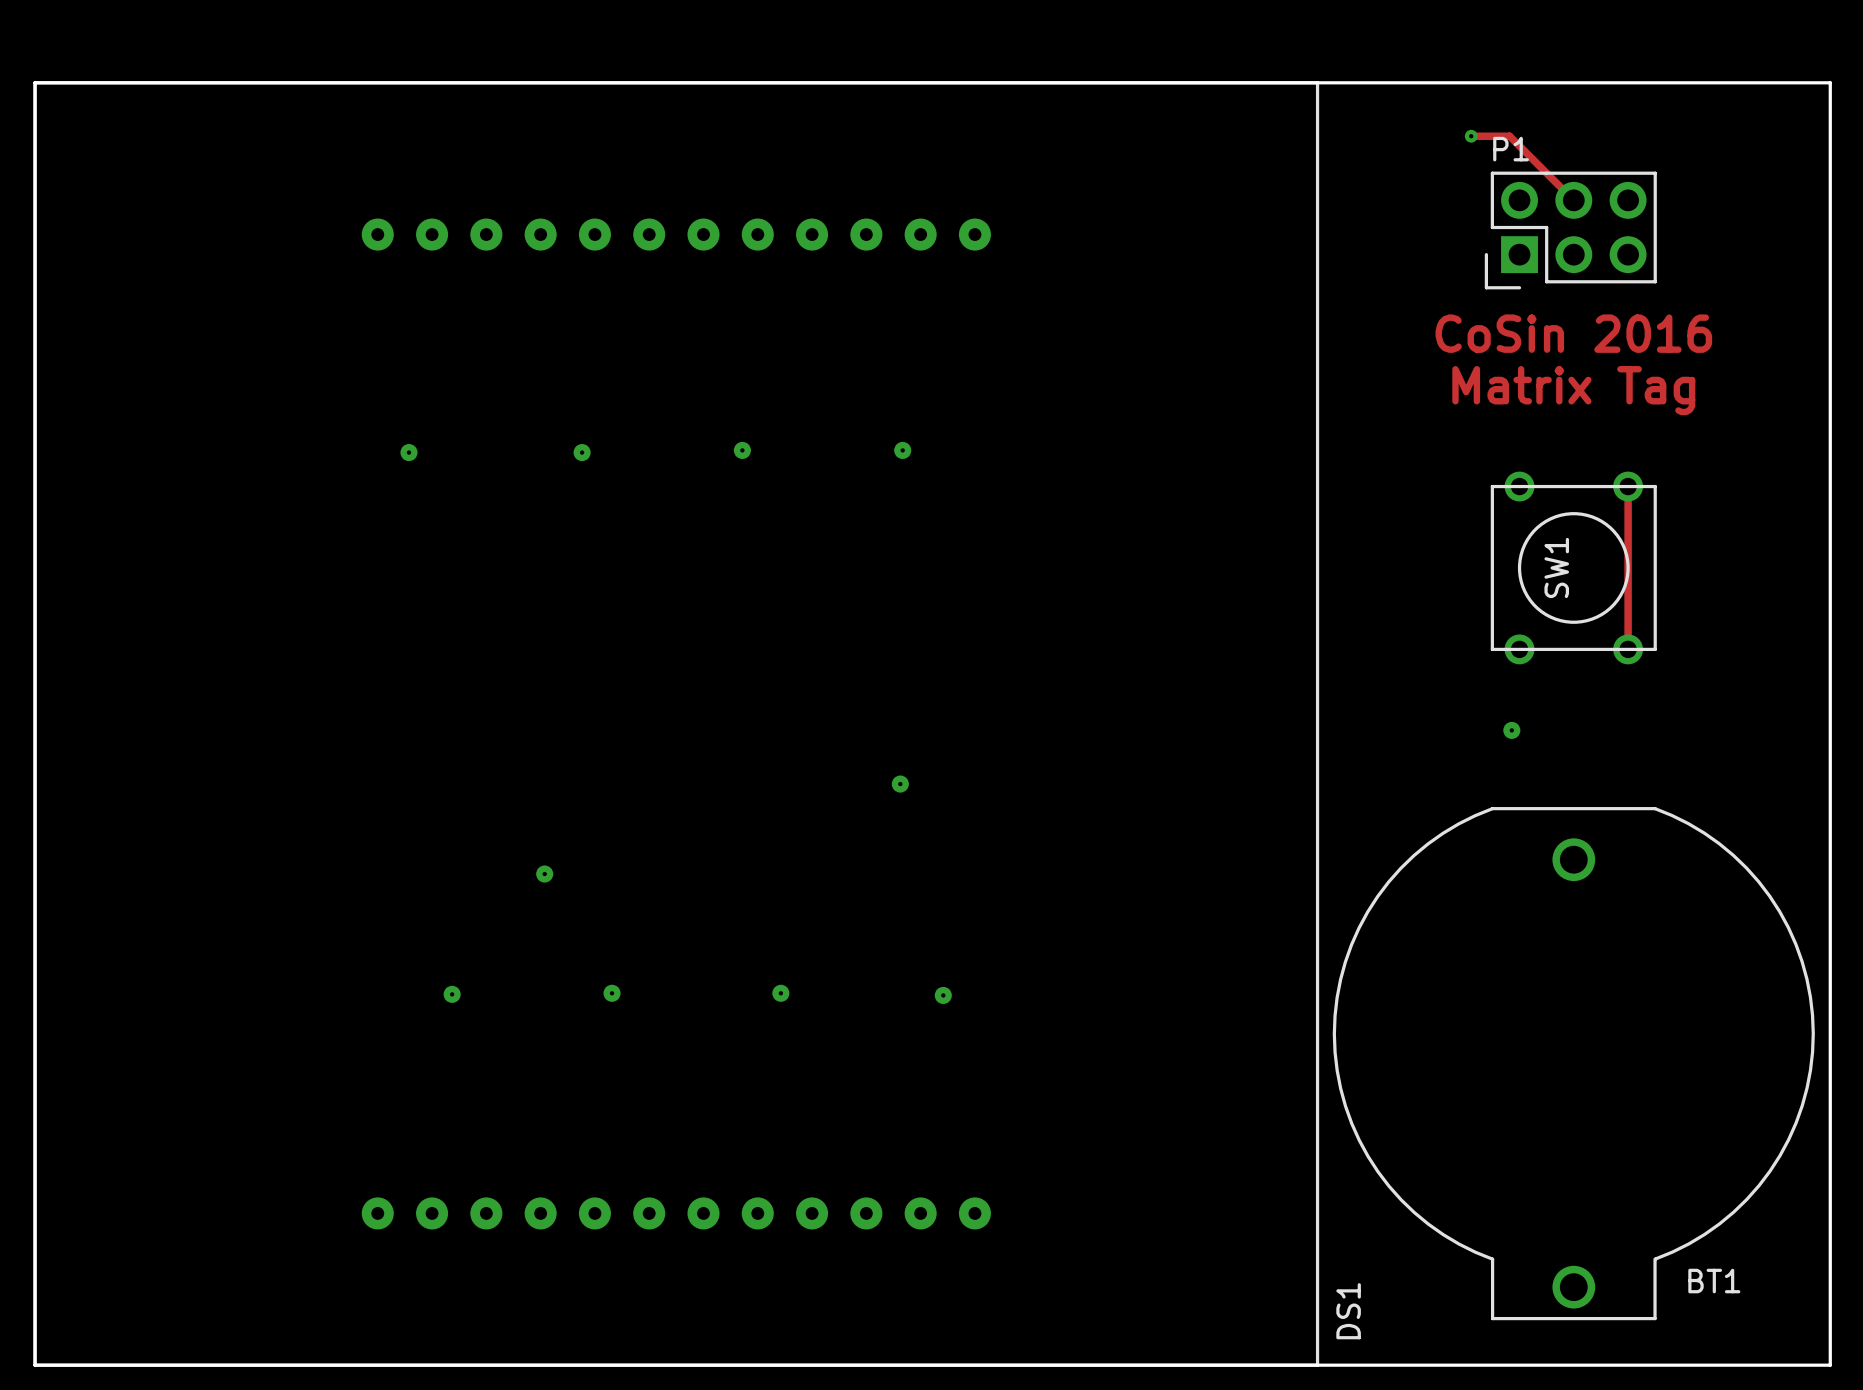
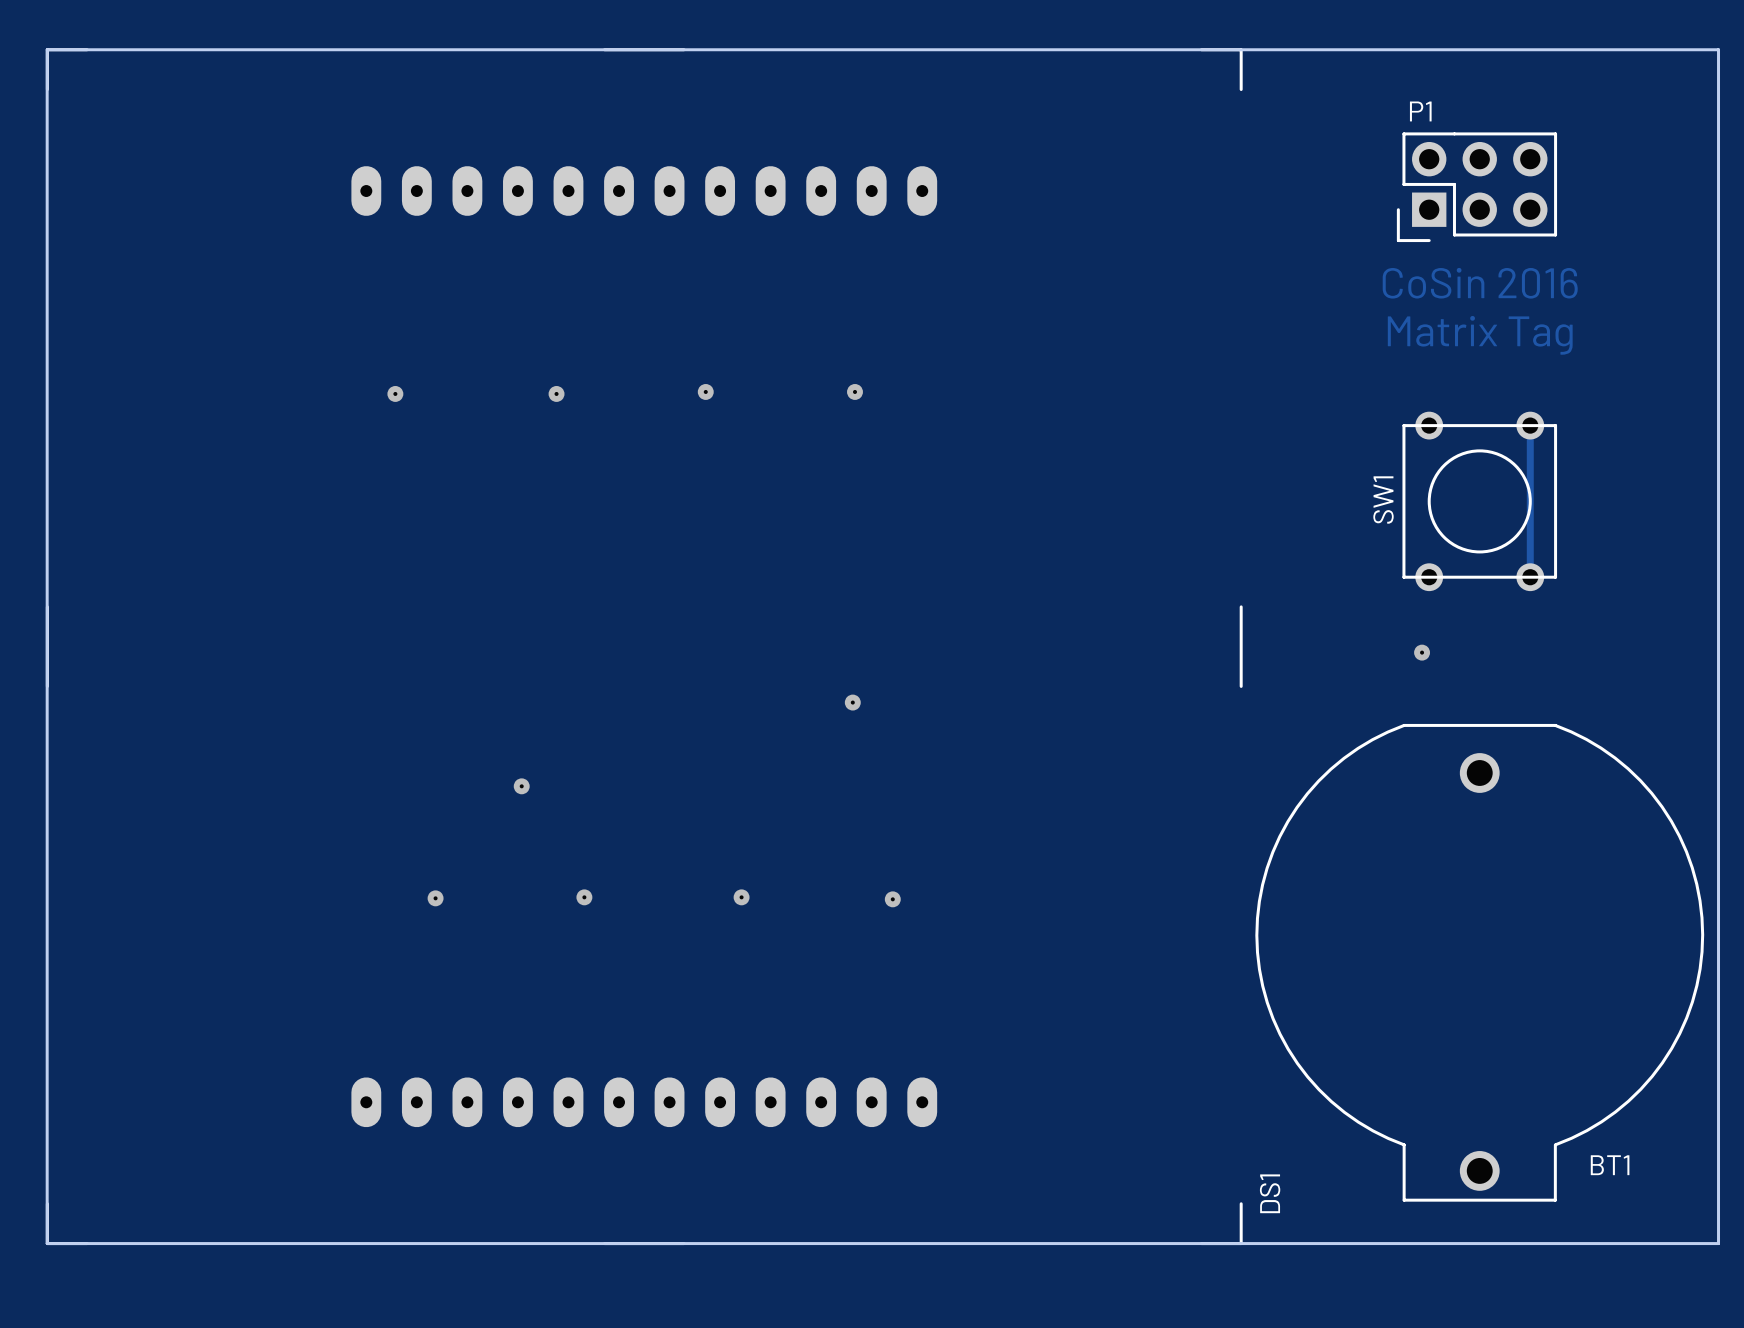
DS1 footprint: [33, 81, 1320, 1367] -> [45, 48, 1243, 1246]
track: (1471, 136) (1509, 136) (1573, 200) -> none
via: (1471, 136) -> none
SW1 name position: SW1 (1556, 567) -> SW1 (1383, 499)

